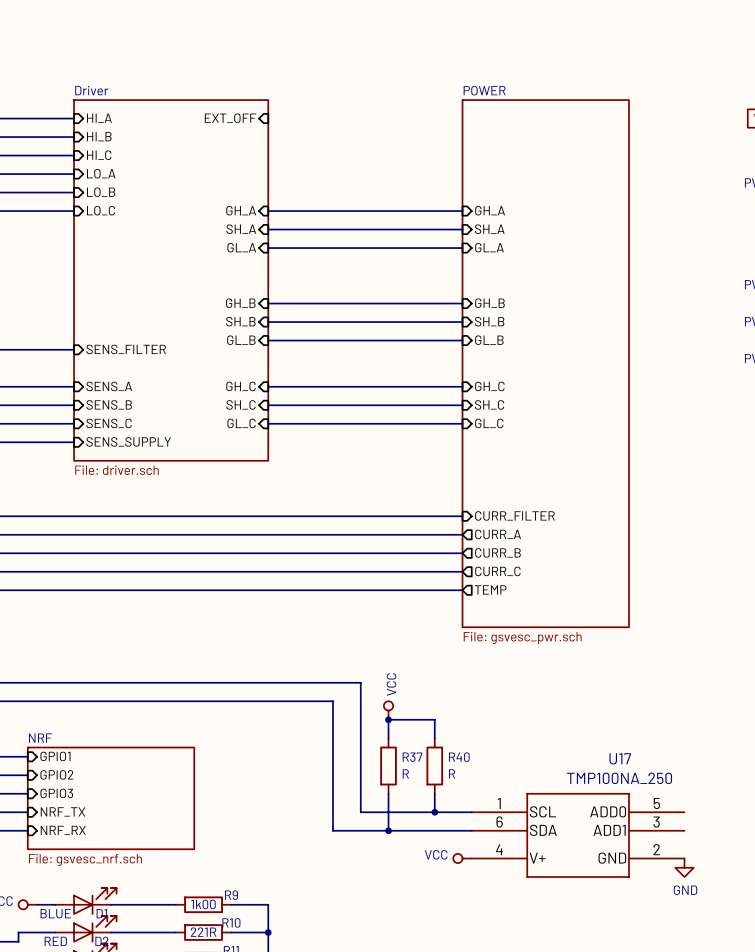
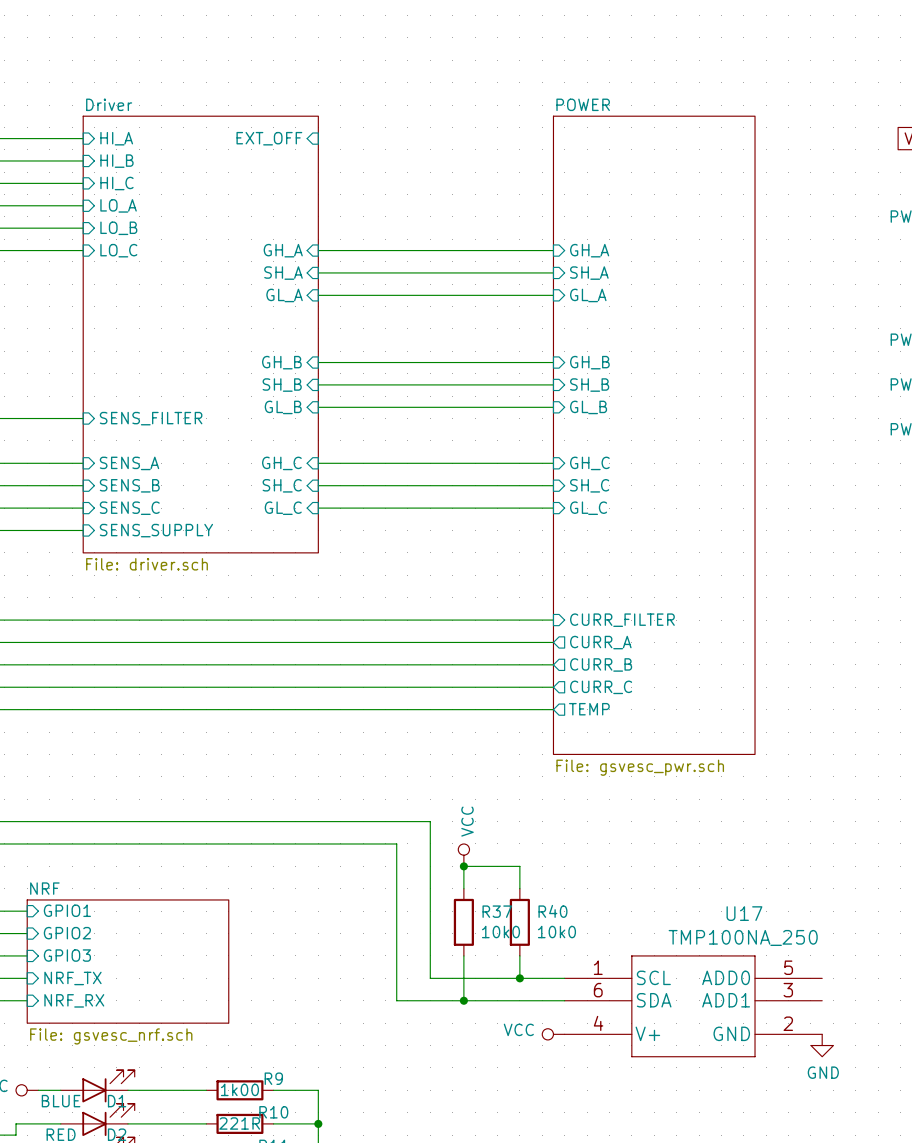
R37 value: R (405, 773) -> 10k0 (500, 932)
R40 value: R (452, 773) -> 10k0 (556, 932)

